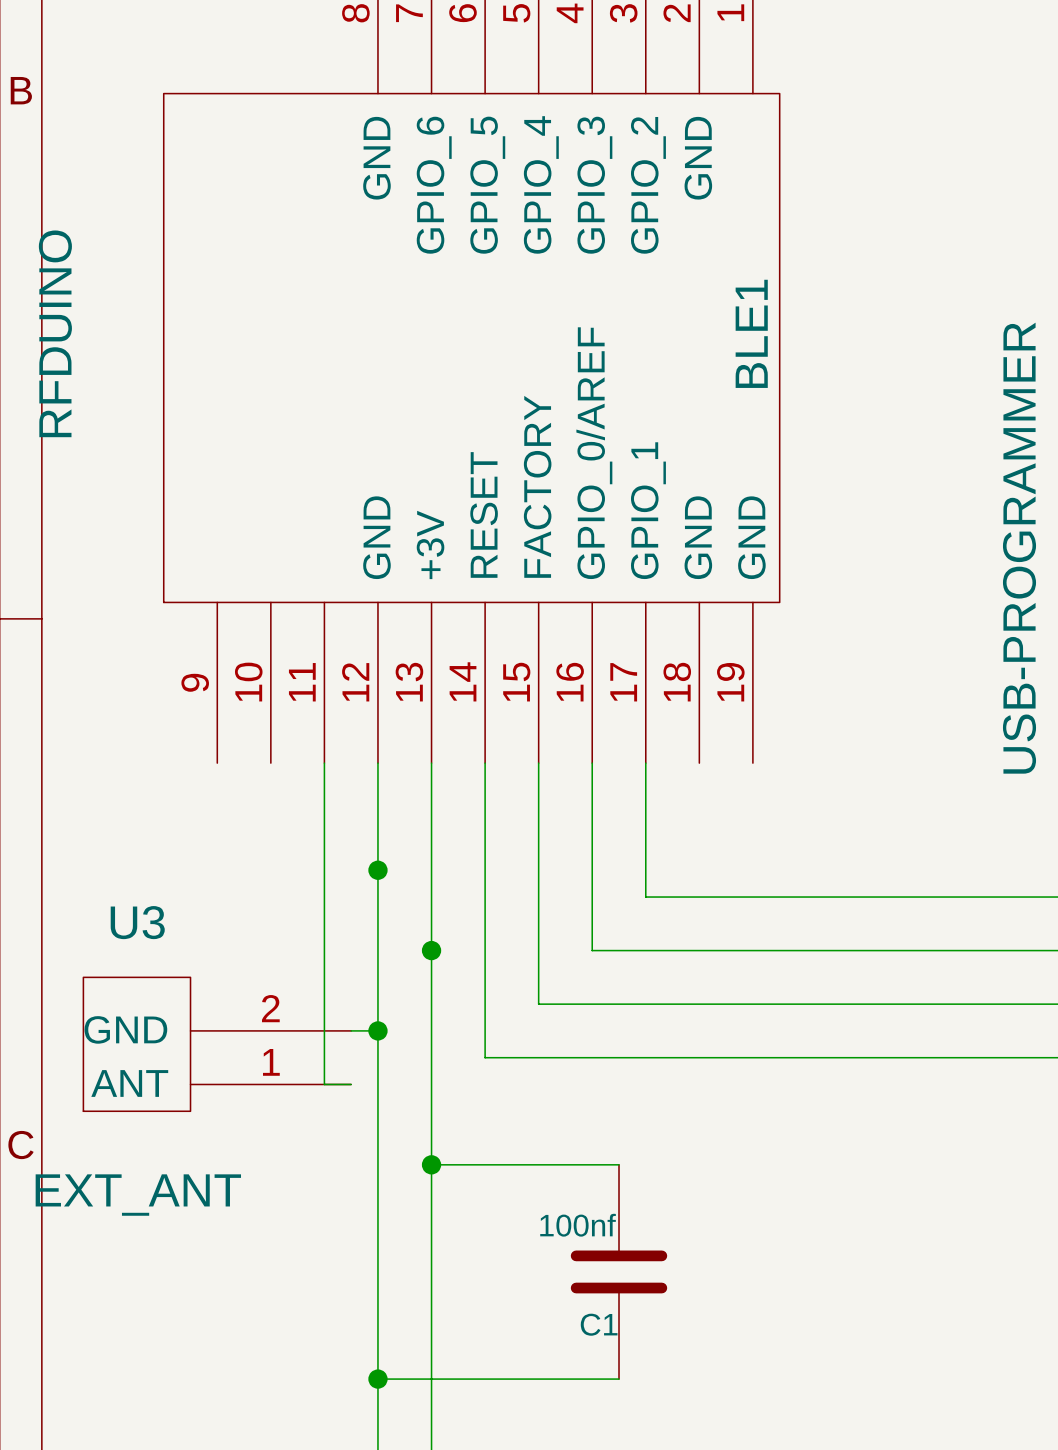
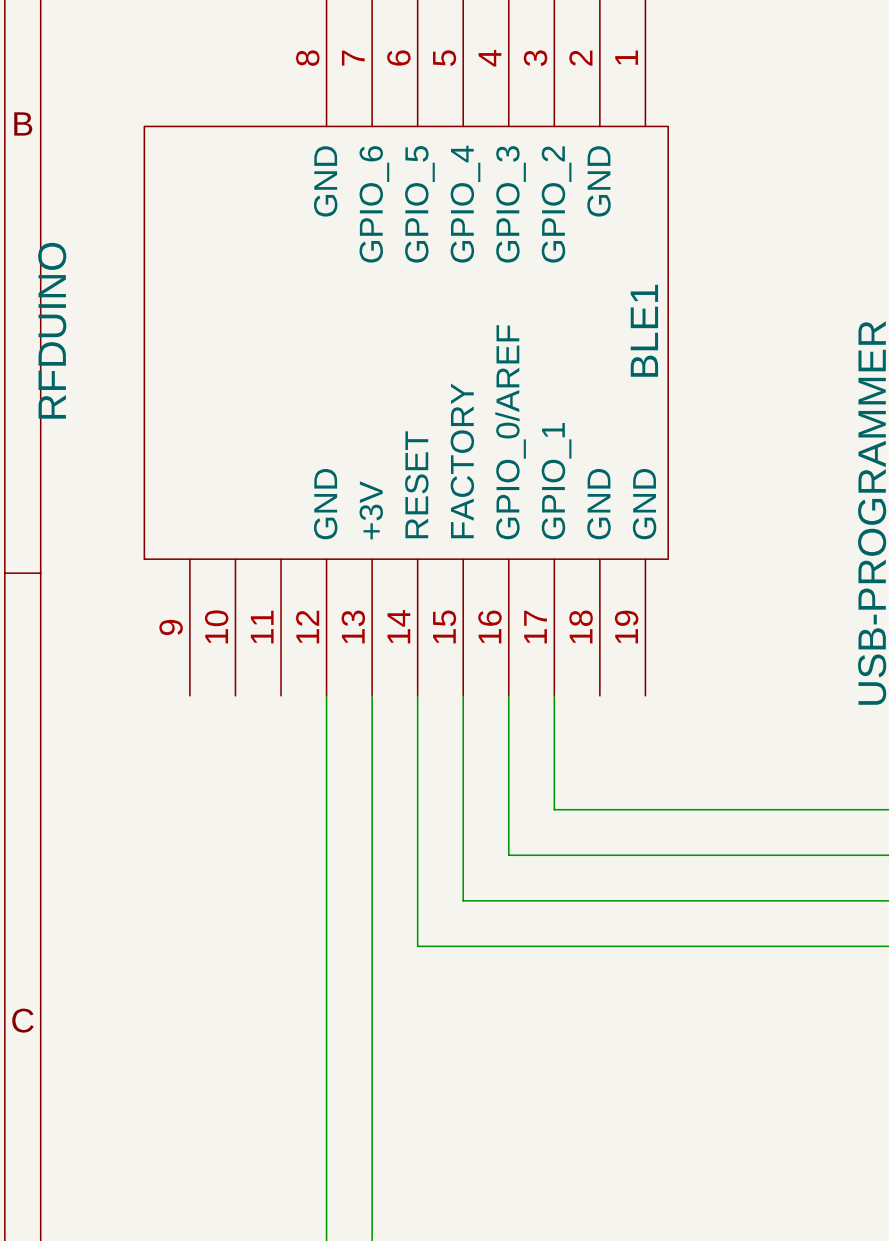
wire: (324, 763) (324, 1084) (351, 1084) -> none
junction: (377, 870) -> none
junction: (431, 950) -> none
wire: (351, 1030) (377, 1030) -> none
junction: (377, 1030) -> none
U3: EXT_ANT (217, 1044) -> none
wire: (431, 1164) (619, 1164) -> none
junction: (431, 1164) -> none
C1: 100nf (619, 1271) -> none
wire: (377, 1379) (619, 1379) -> none
junction: (377, 1379) -> none

